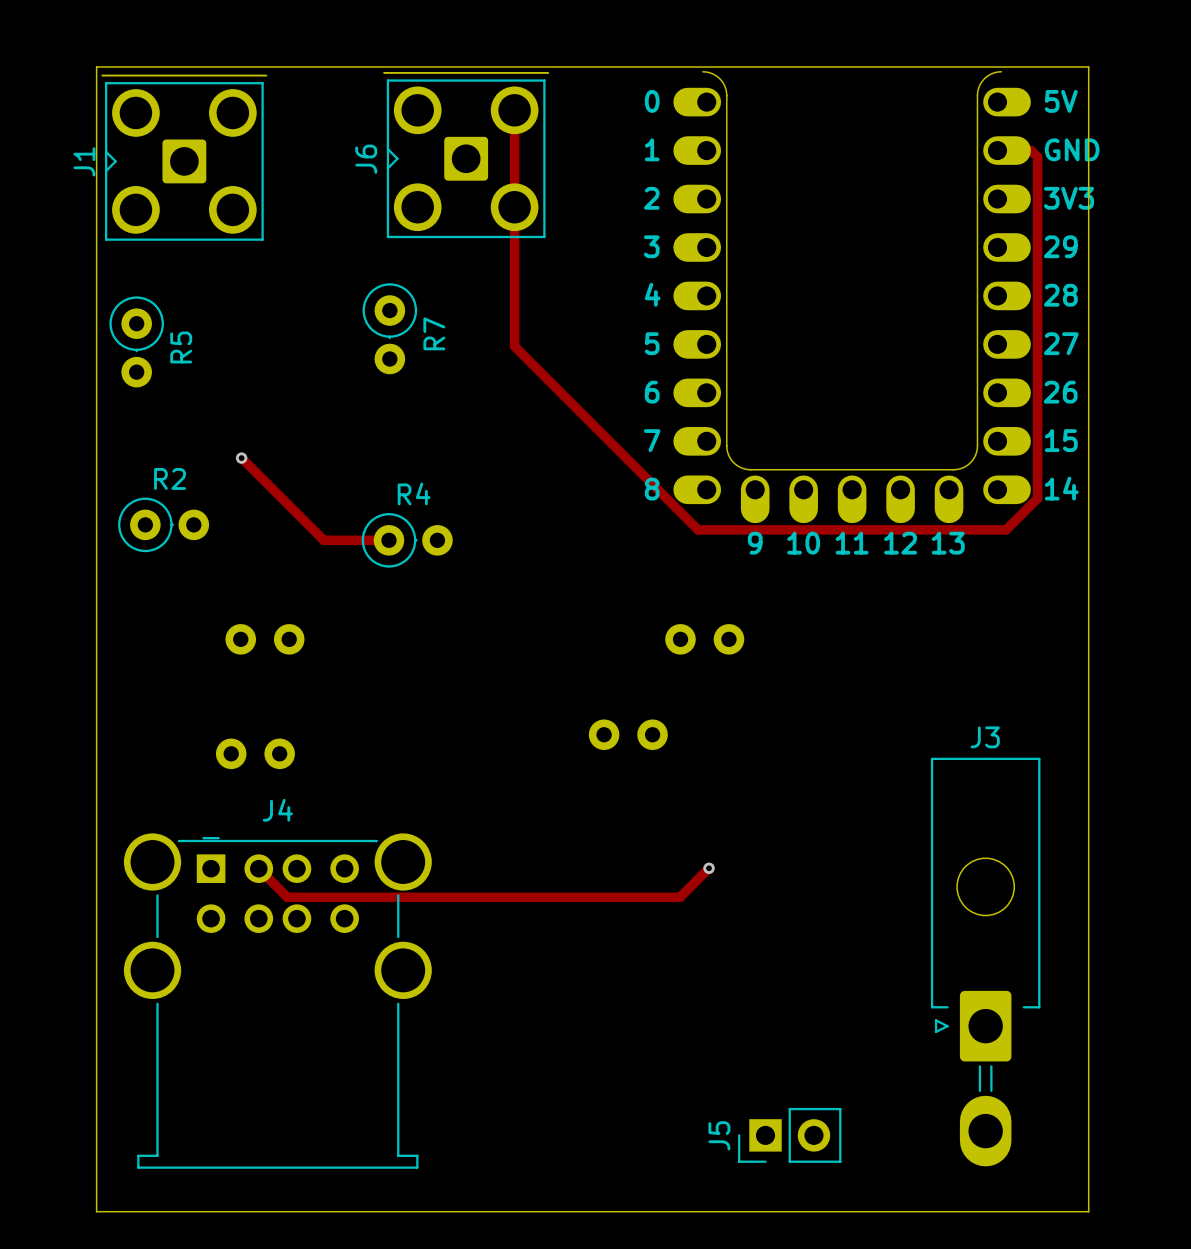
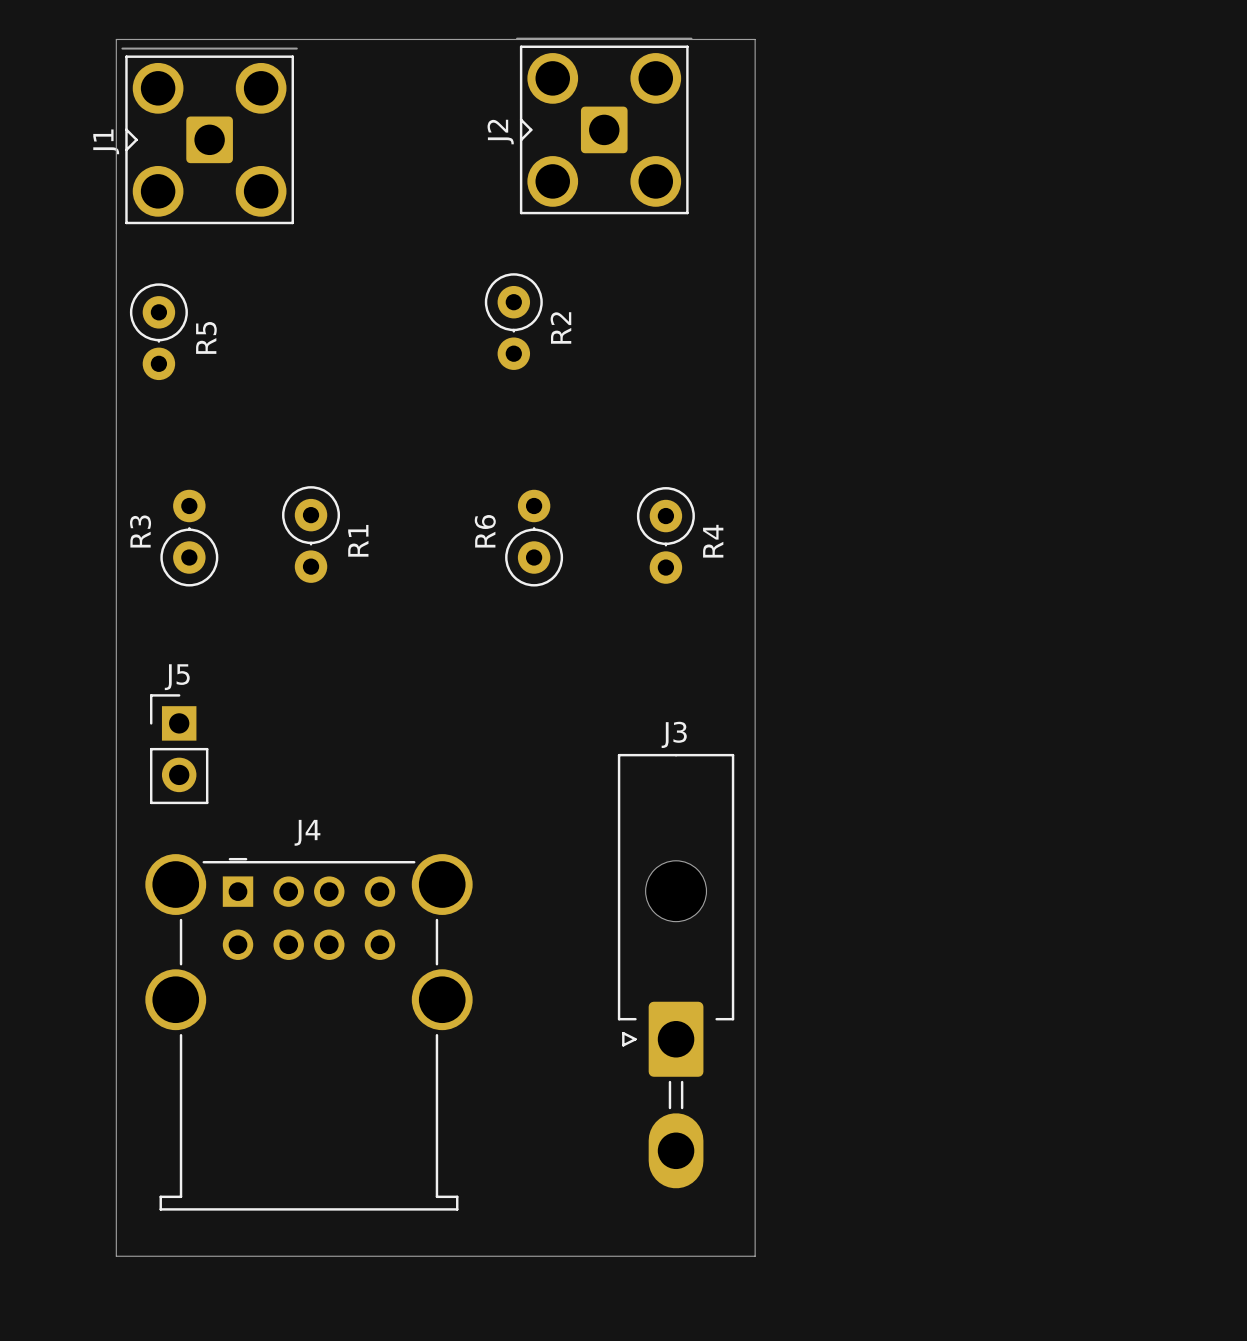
board edge: (697, 67) (1088, 67) (1088, 1211) (697, 1211) -> (755, 39) (755, 1256)
track: (514, 110) (514, 346) (698, 529) (1006, 529) (1037, 498) (1037, 157) (1031, 150) (997, 150) -> none
J2: none -> (604, 125)
J6: (466, 155) -> none
part: (852, 297) -> none
R7: (389, 328) -> none
track: (241, 458) (323, 540) (388, 540) -> none
via: (241, 458) -> none
R2 rotation: 0° (163, 524) -> 90° clockwise (513, 321)
R2 position: (163, 524) -> (513, 321)
R6: none -> (534, 538)
R4 rotation: 0° (407, 540) -> 90° clockwise (665, 535)
R4 position: (407, 540) -> (665, 535)
R1 side: bottom (264, 639) -> top (311, 534)
part: (704, 639) -> none
part: (628, 734) -> none
R3 side: bottom (255, 753) -> top (189, 538)
track: (709, 868) (680, 897) (287, 897) (258, 868) -> none
via: (709, 868) -> none
J3 position: (985, 962) -> (676, 971)
J5 rotation: 0° (789, 1135) -> 90° clockwise (179, 749)
J5 position: (789, 1135) -> (179, 749)

